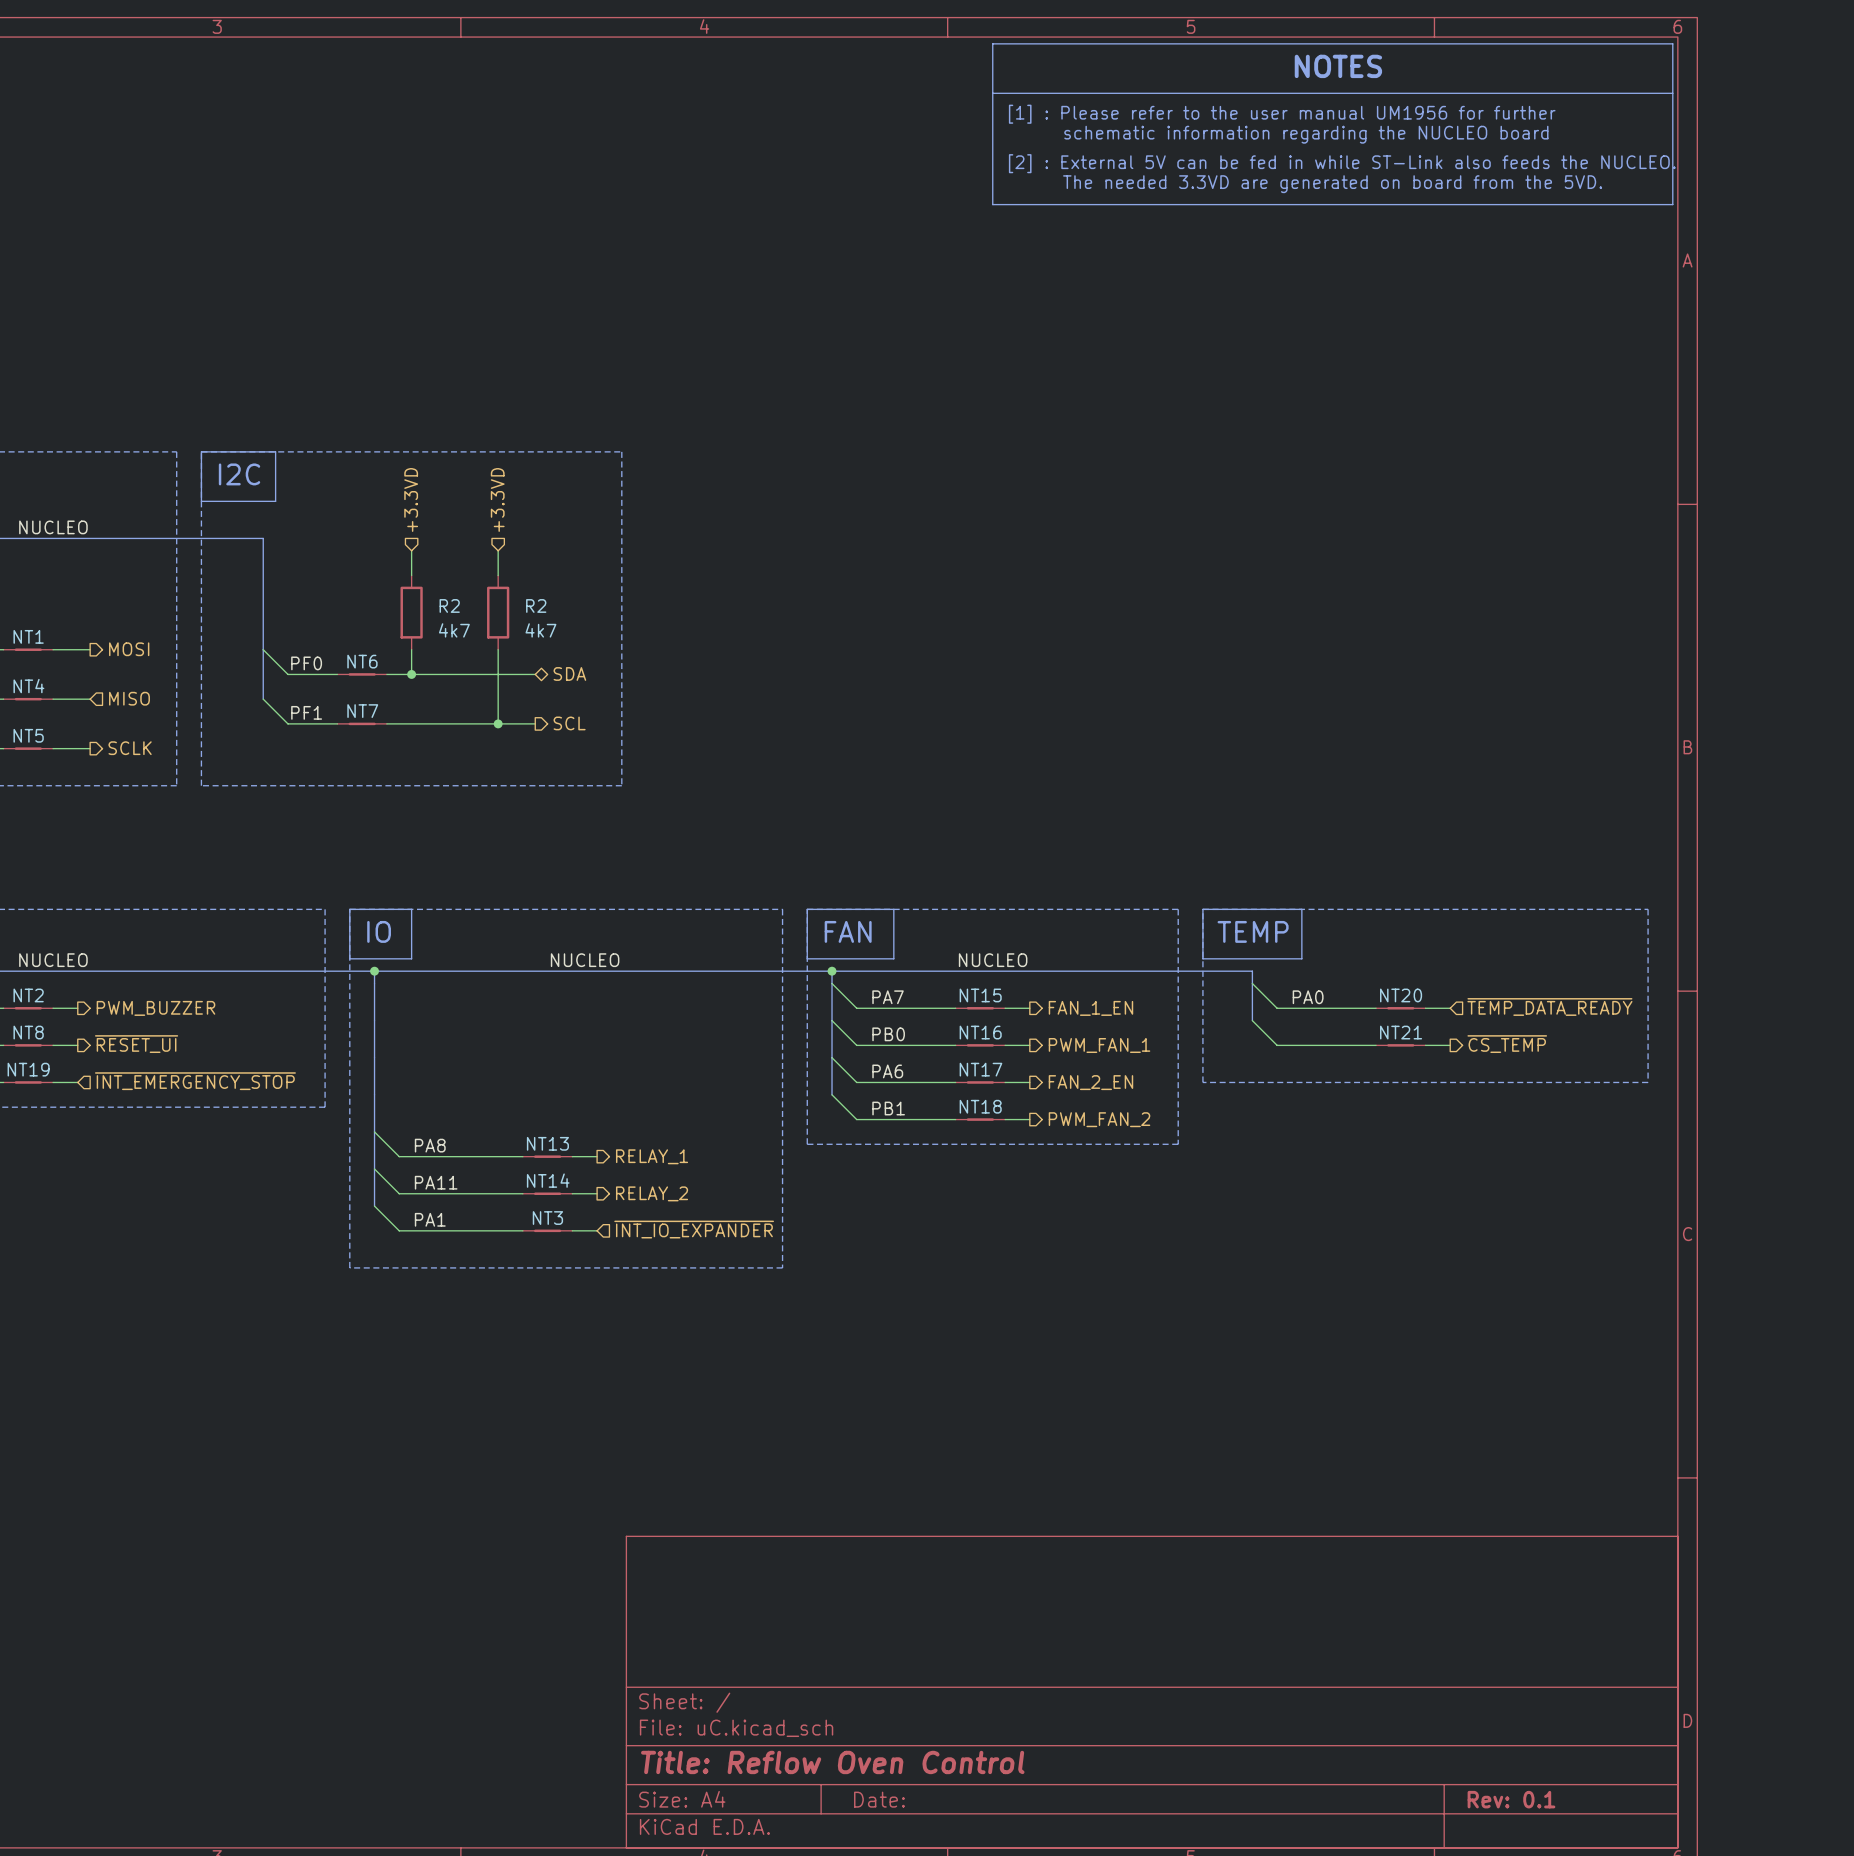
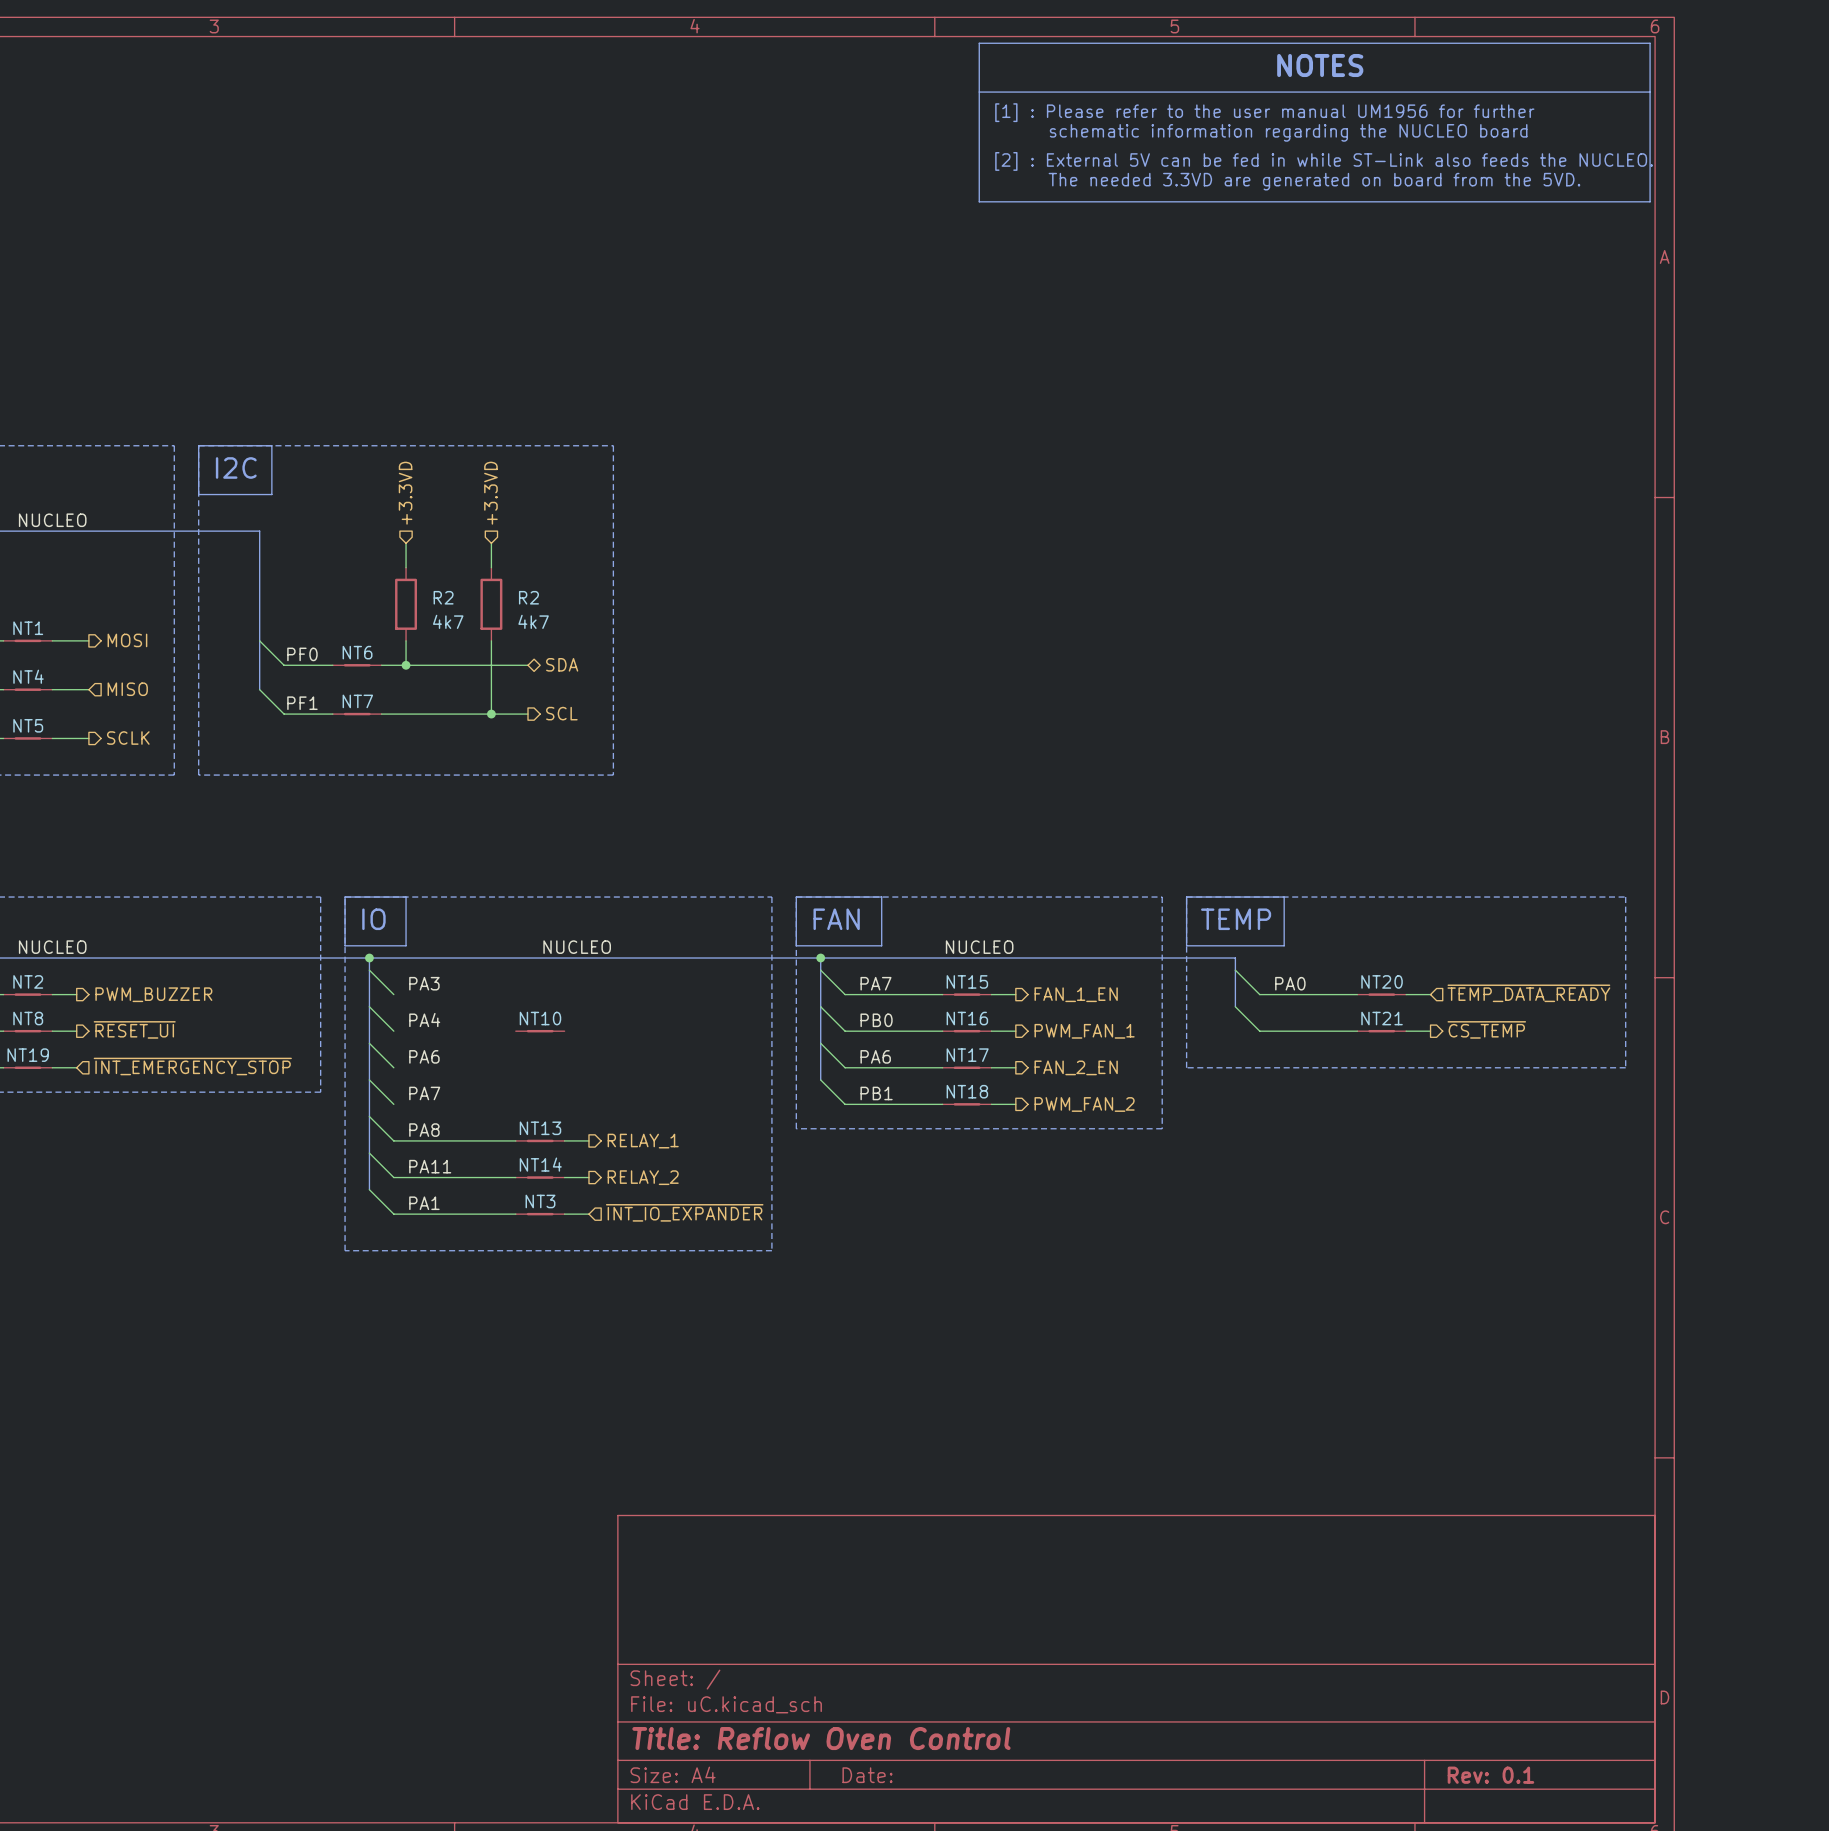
wire: none -> (369, 970) (393, 994)
label: none -> PA3 (424, 983)
wire: none -> (369, 1006) (393, 1031)
label: none -> PA4 (424, 1020)
NT10: none -> (540, 1031)
wire: none -> (369, 1043) (393, 1067)
label: none -> PA6 (424, 1056)
wire: none -> (369, 1079) (393, 1104)
label: none -> PA7 (424, 1093)

